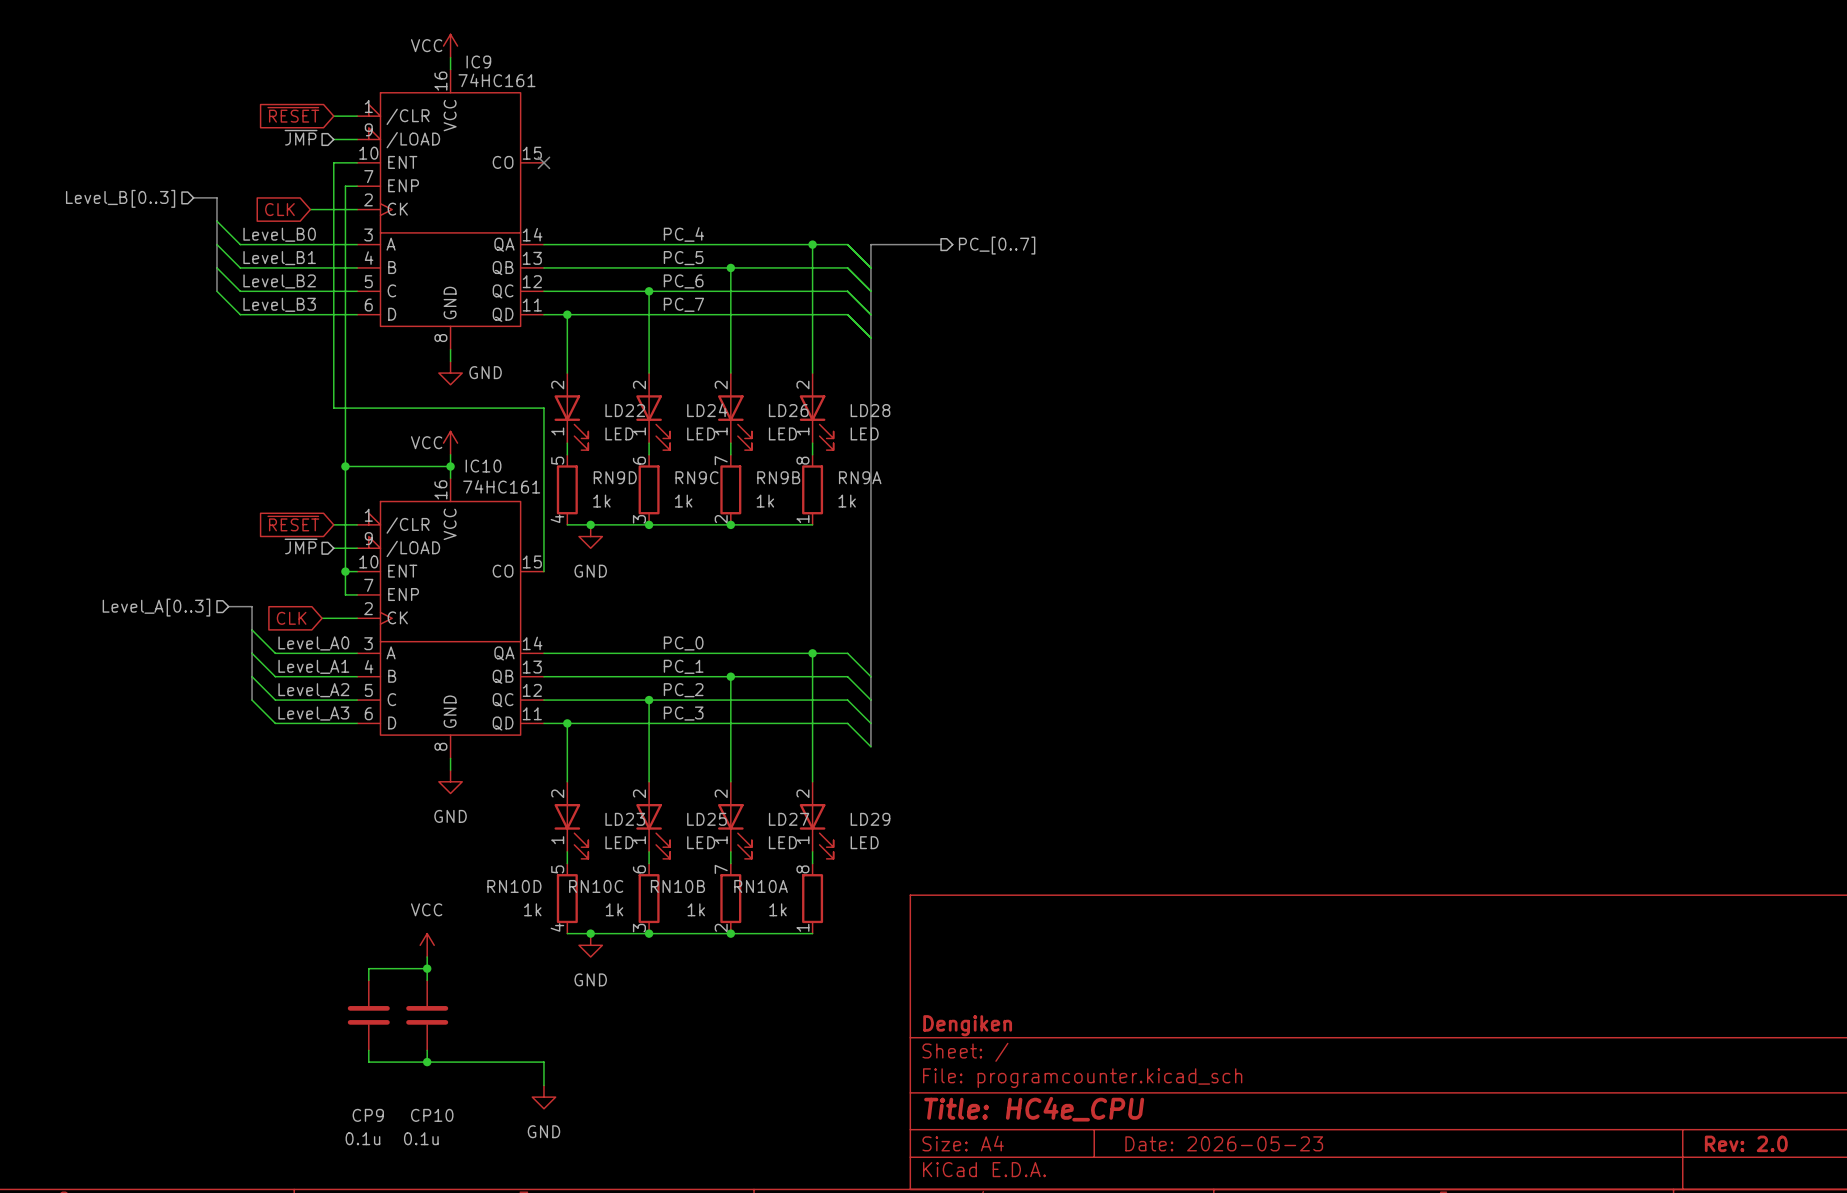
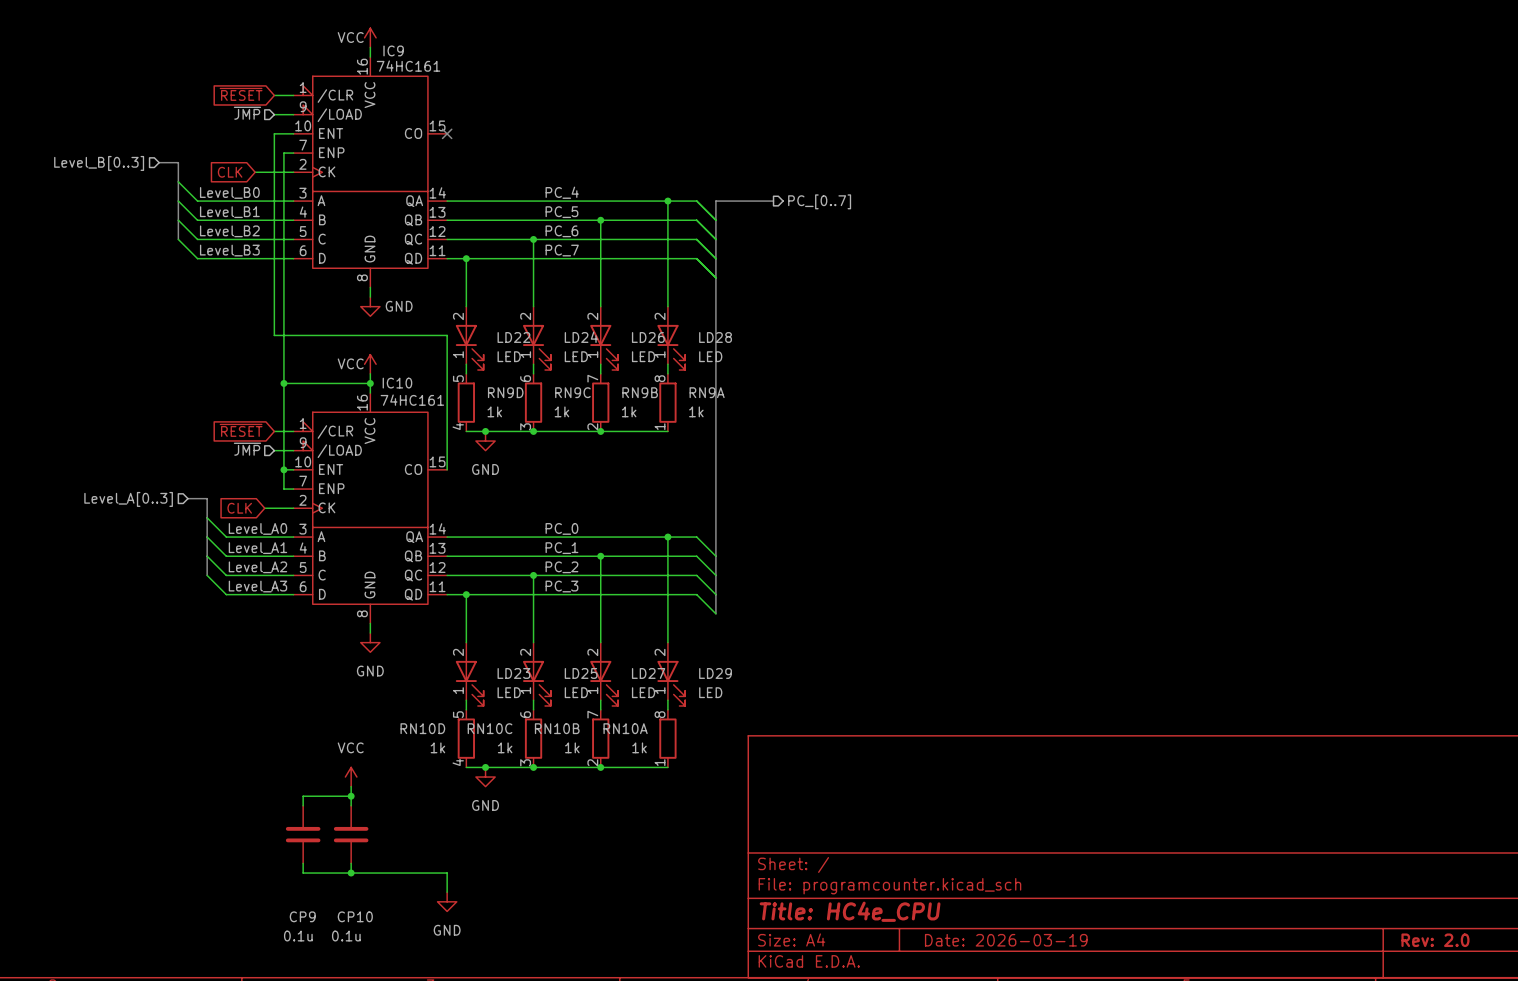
title block: Dengiken (967, 1025) -> none
title block: Date: 2026-05-23 (1224, 1143) -> Date: 2026-03-19 (1006, 940)

